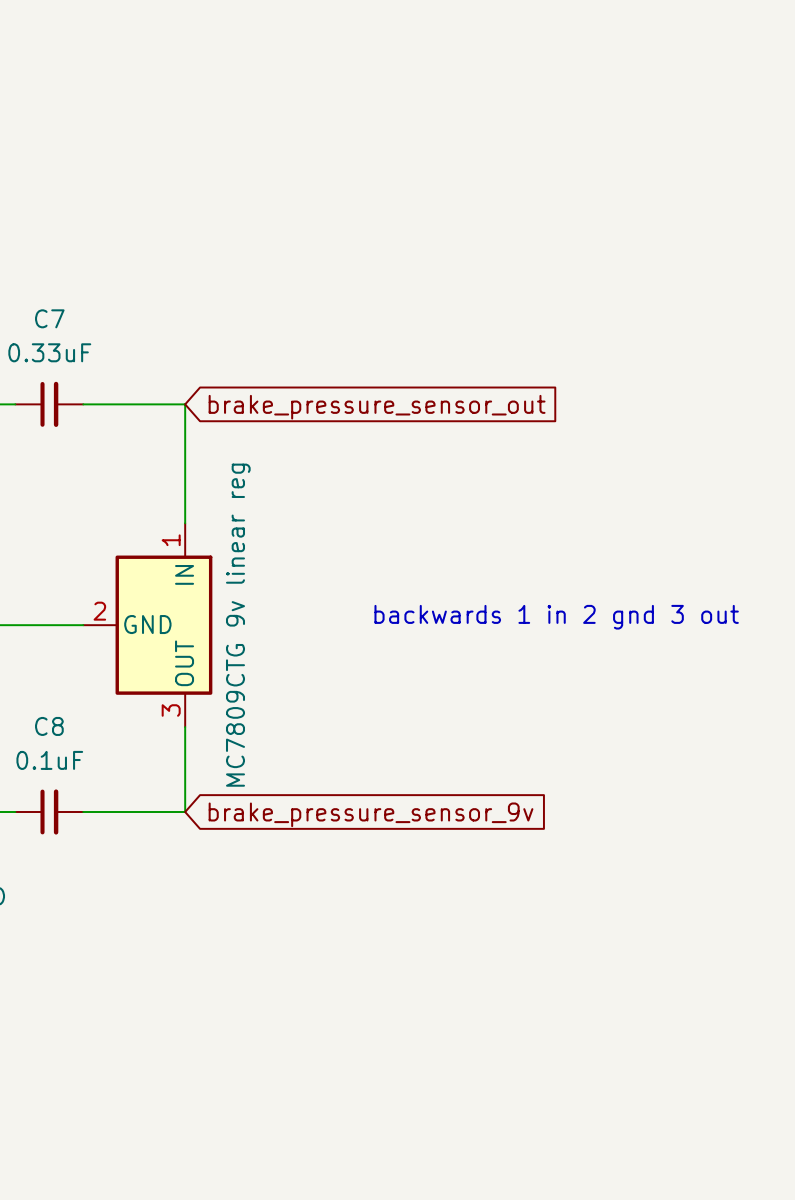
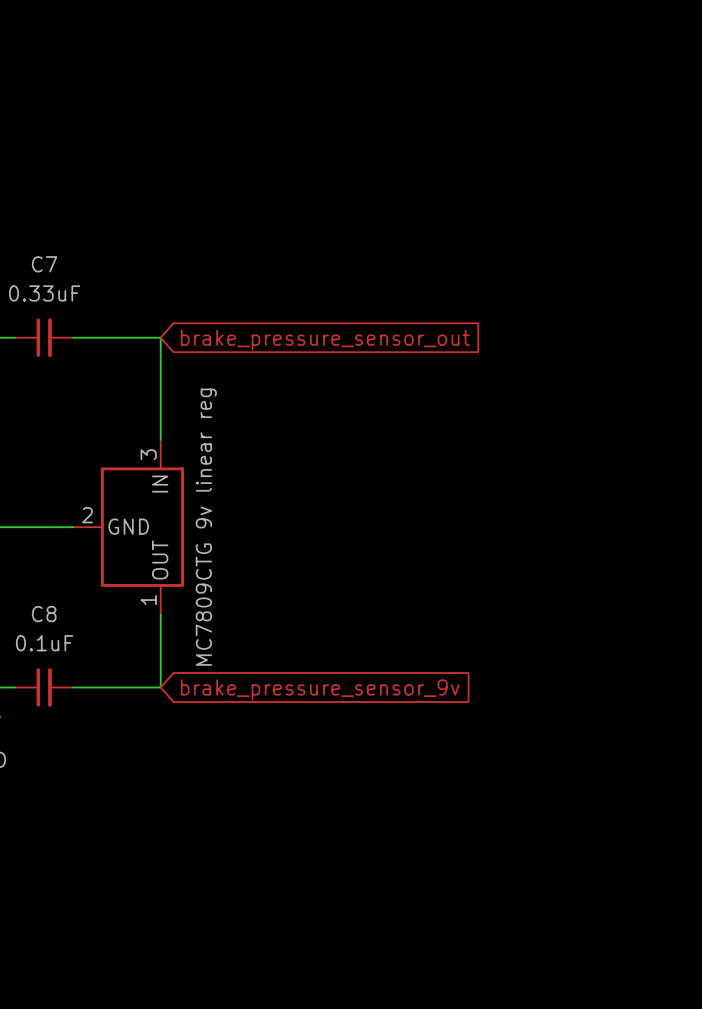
part pin number: 1 (171, 540) -> 3 (148, 454)
text: backwards 1 in 2 gnd 3 out (556, 617) -> none
part pin number: 3 (171, 710) -> 1 (148, 600)

